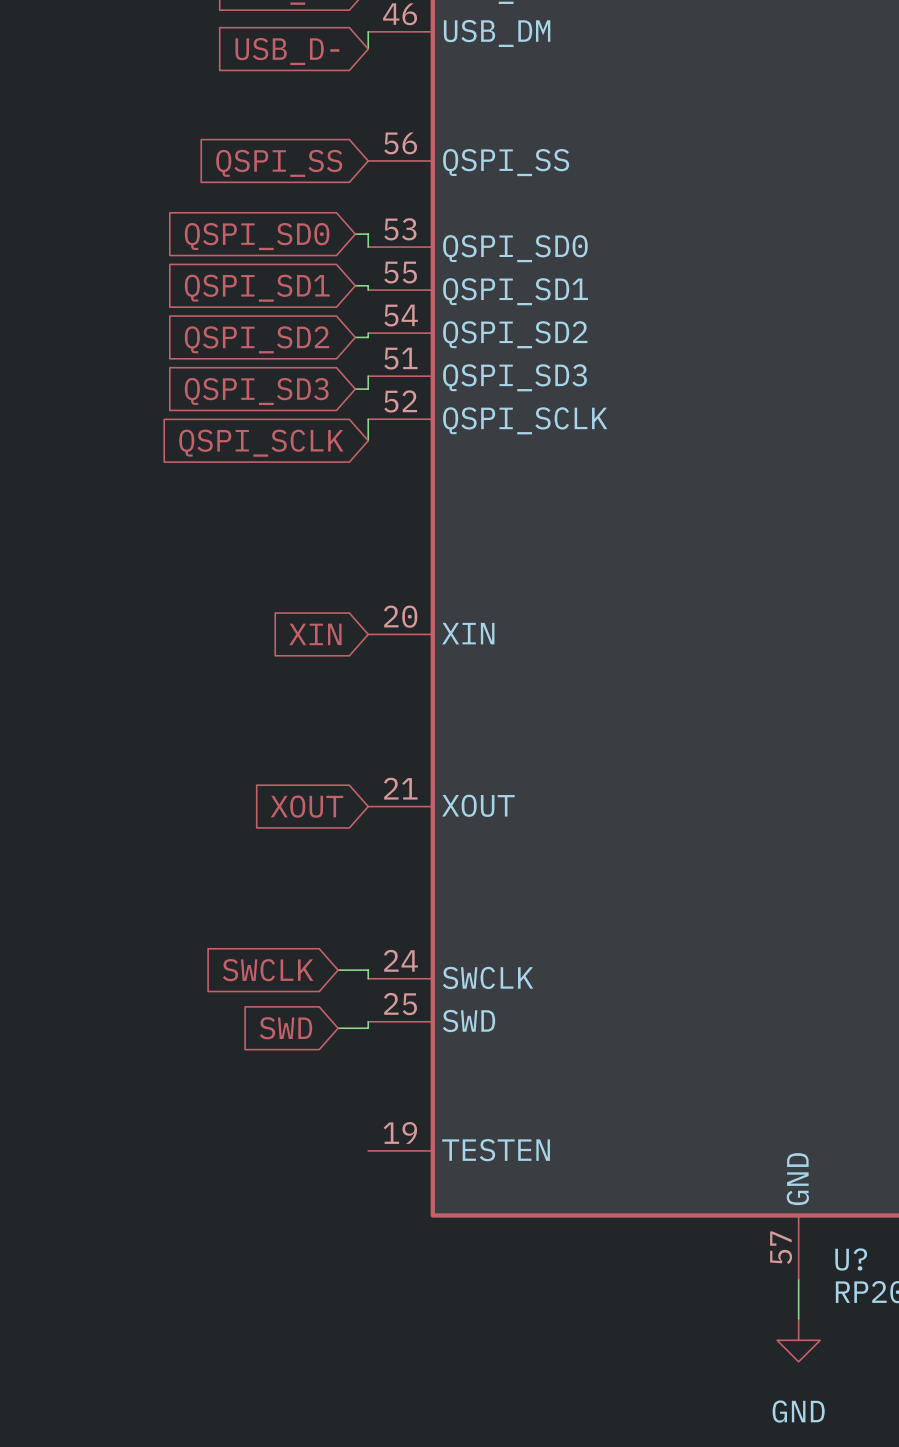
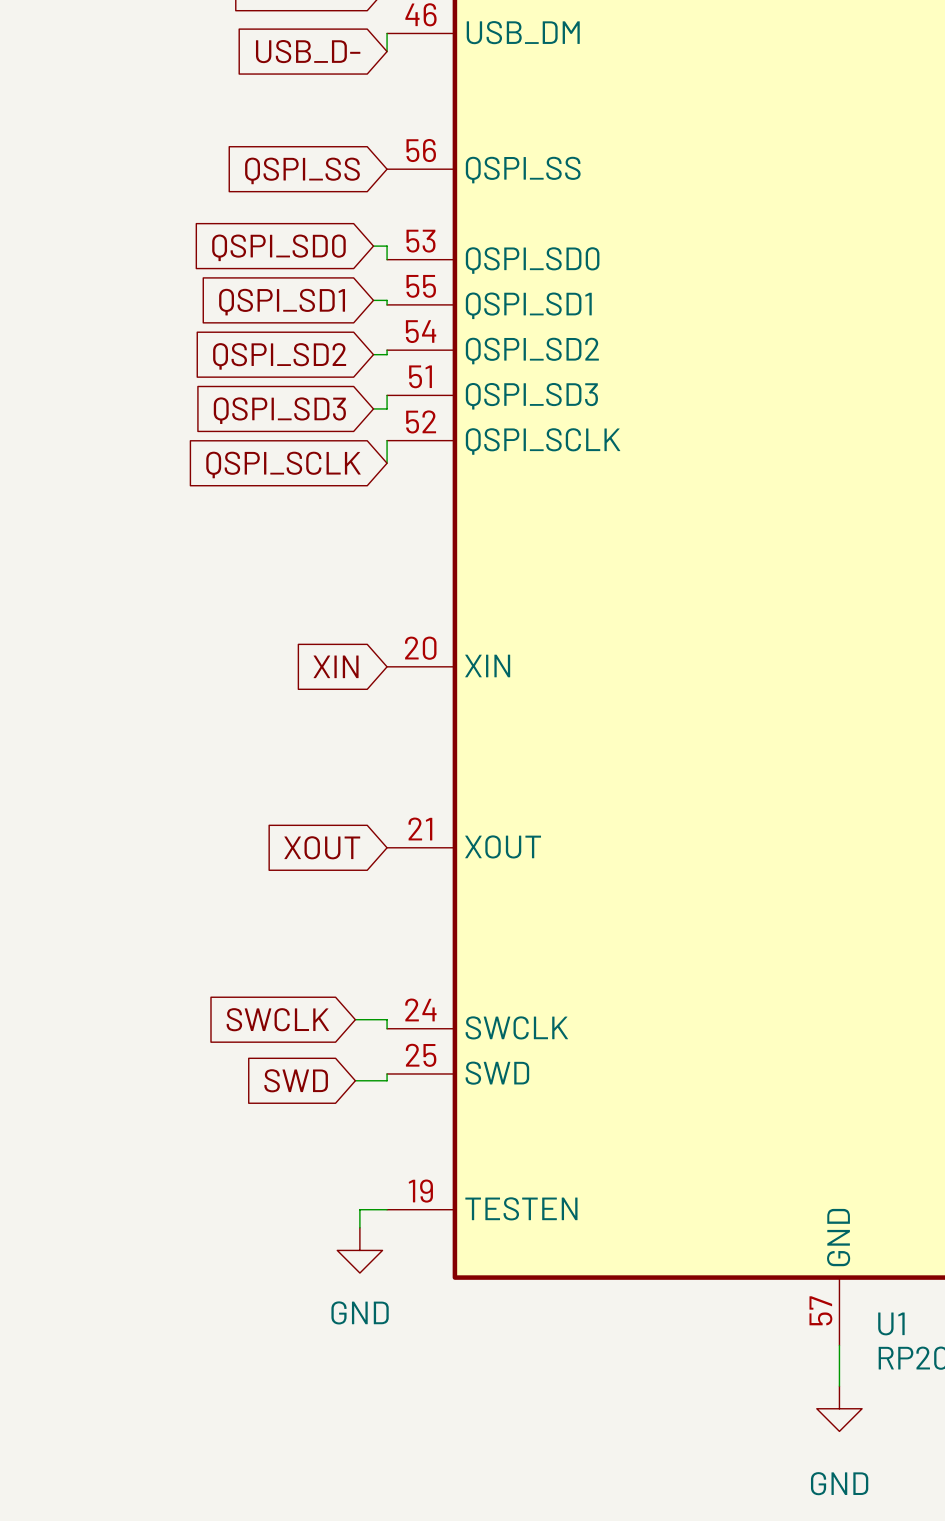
wire: none -> (387, 1209) (359, 1209) (359, 1227)
power symbol: none -> GND (359, 1250)
U? name: U? (851, 1259) -> U1 (891, 1323)

